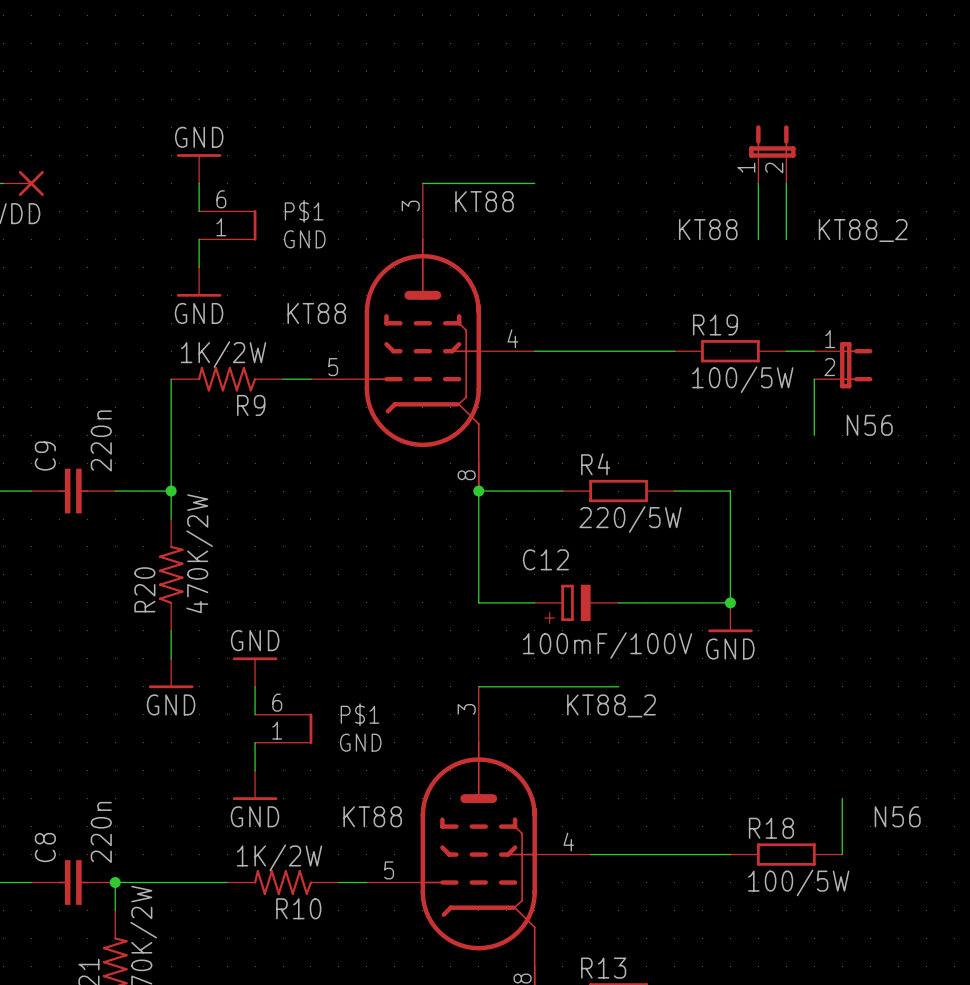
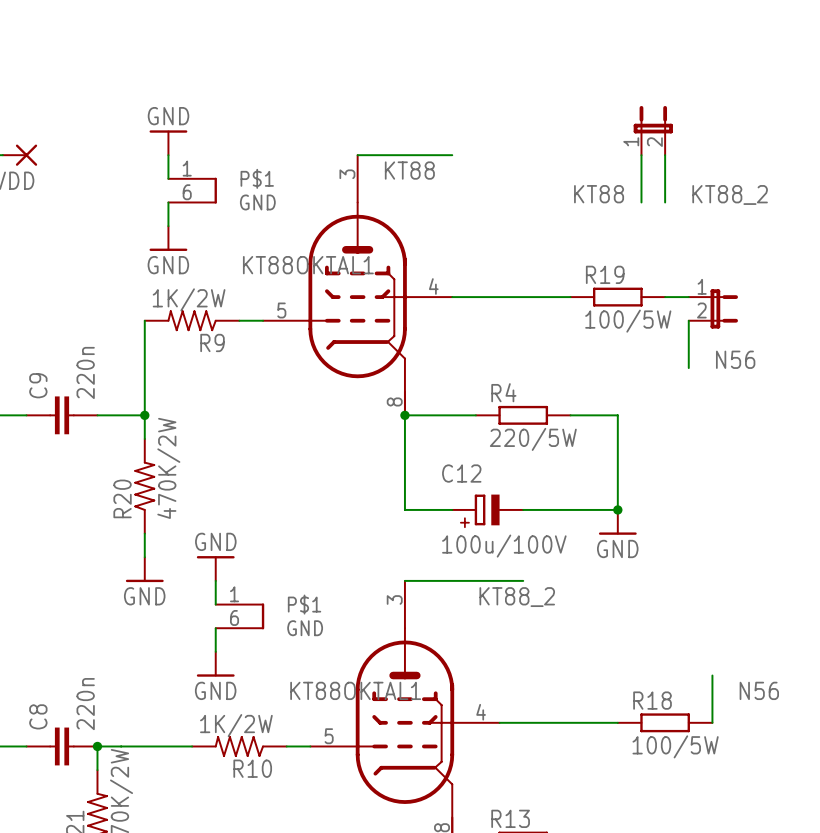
part pin number: 6 (221, 199) -> 1 (187, 168)
part pin number: 1 (221, 227) -> 6 (187, 192)
part value: KT88 (316, 313) -> KT88OKTAL1 (308, 265)
C12 value: 100mF/100V (607, 645) -> 100u/100V (504, 546)
part pin number: 6 (277, 702) -> 1 (234, 594)
part pin number: 1 (277, 730) -> 6 (234, 617)
part value: KT88 (372, 816) -> KT88OKTAL1 (355, 690)

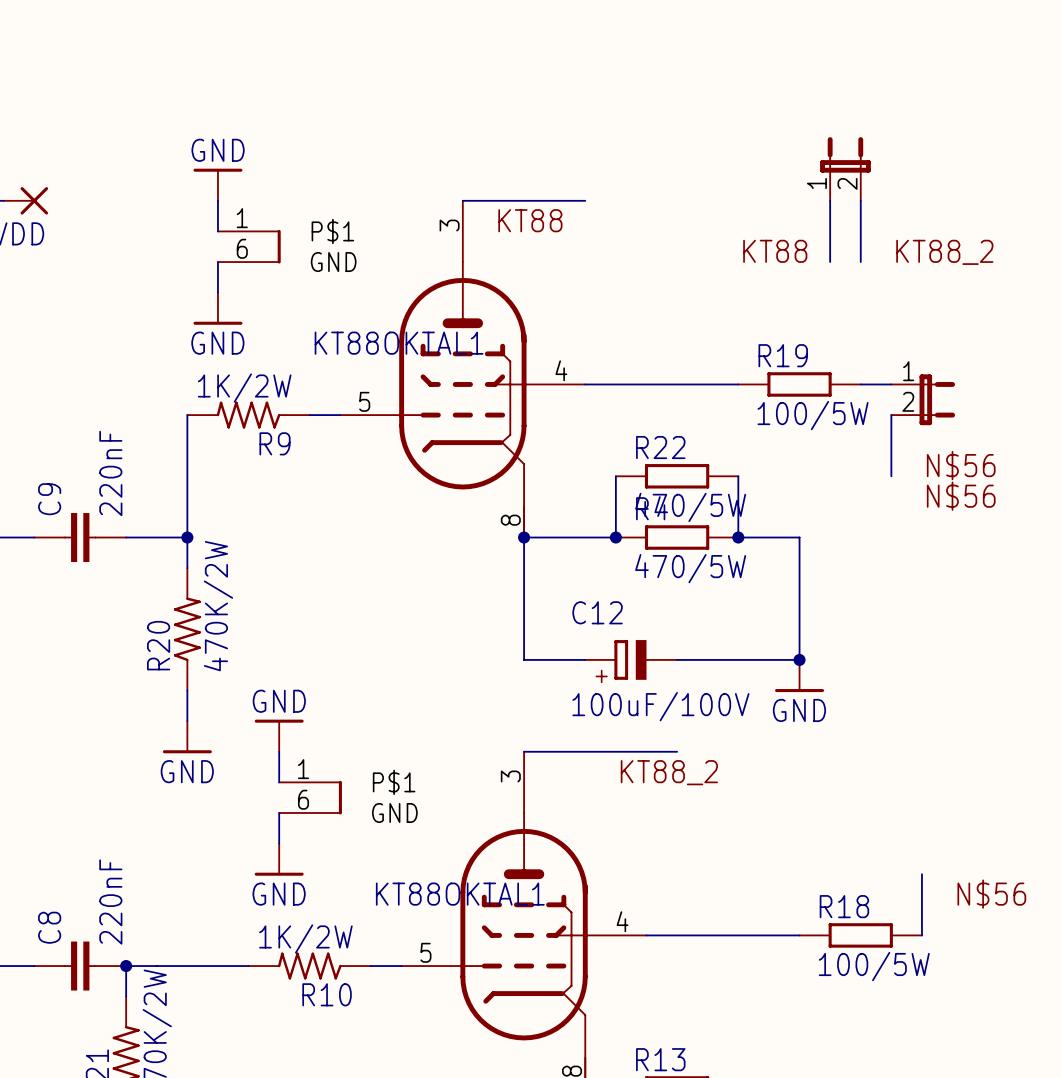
label: N56 (735, 359) -> N$56 (961, 465)
wire: none -> (615, 476) (615, 537)
R22: none -> 470/5W (677, 476)
wire: none -> (738, 476) (738, 537)
C9 value: 220n (85, 372) -> 220nF (110, 473)
label: none -> N$56 (961, 496)
junction: none -> (615, 537)
junction: none -> (738, 537)
R4 value: 220/5W (533, 439) -> 470/5W (690, 568)
C12 value: 100u/100V (504, 546) -> 100uF/100V (660, 706)
label: N56 (759, 690) -> N$56 (991, 894)
C8 value: 220n (85, 704) -> 220nF (110, 902)

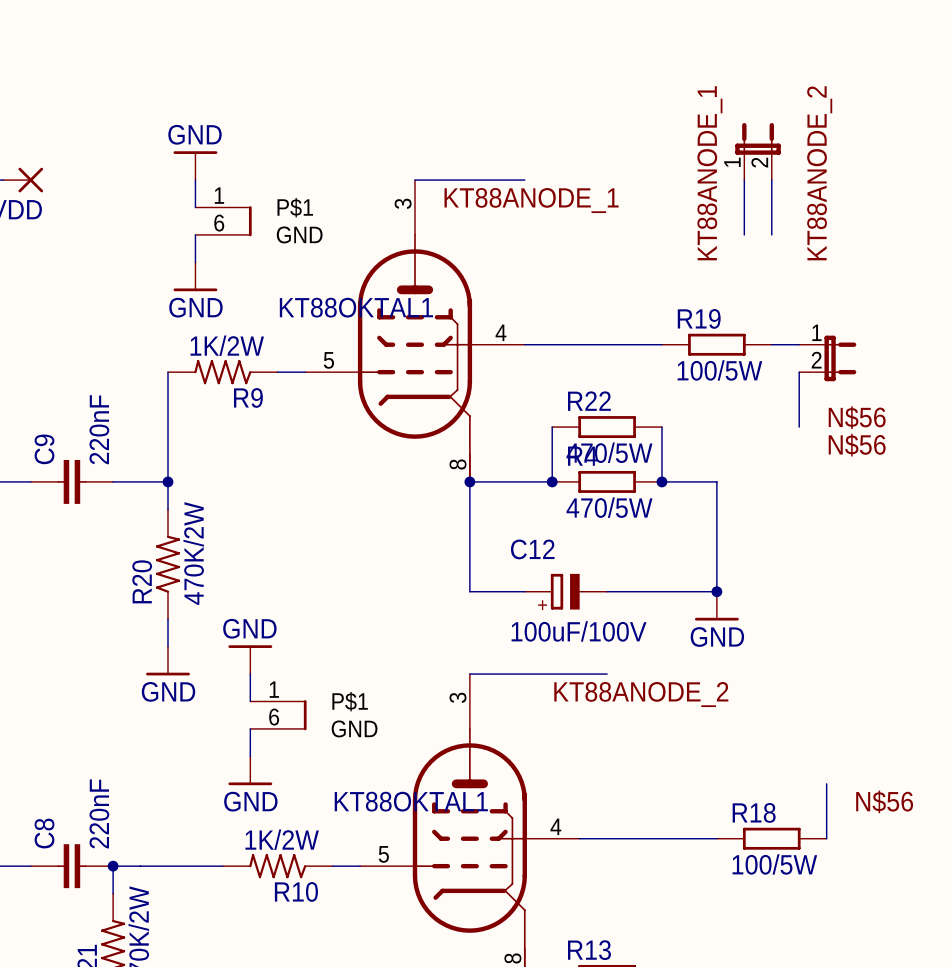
label: none -> KT88ANODE_1 (709, 173)
label: KT88 (530, 220) -> KT88ANODE_1 (531, 200)
label: KT88 (775, 251) -> none
label: KT88_2 (944, 252) -> KT88ANODE_2 (819, 173)
label: KT88_2 (669, 772) -> KT88ANODE_2 (641, 694)

